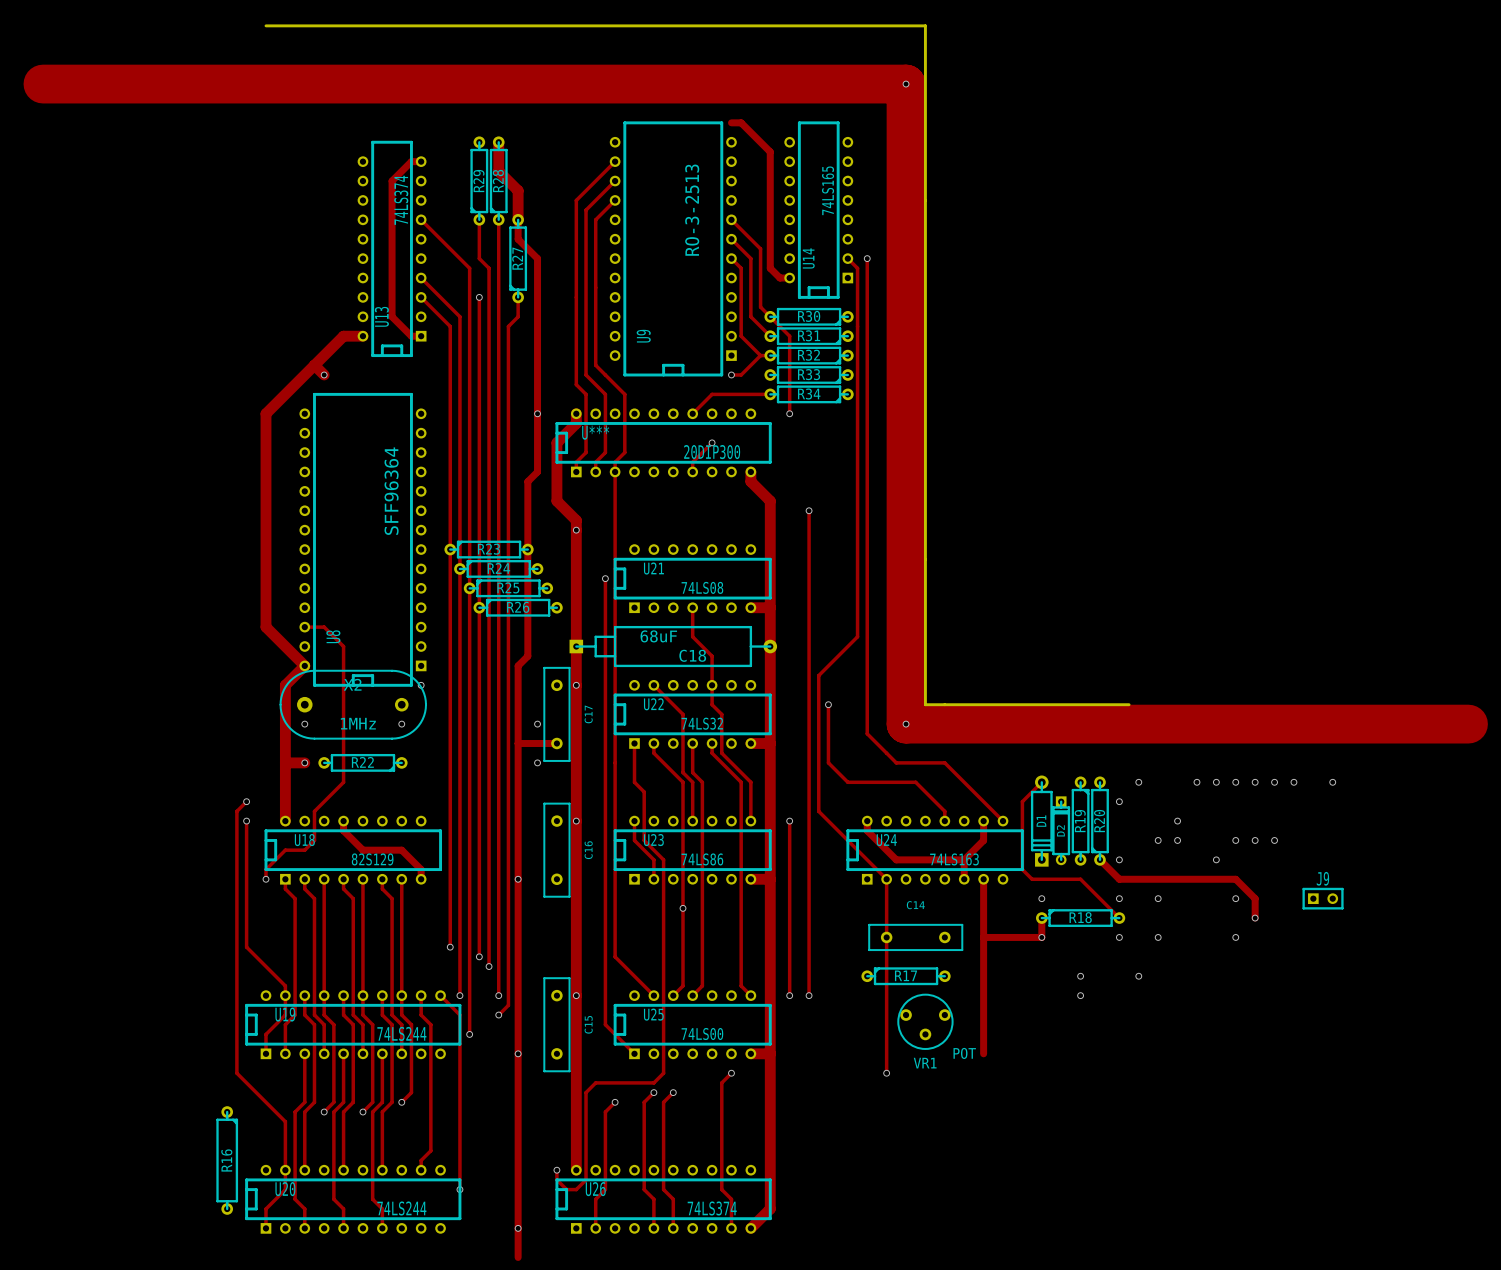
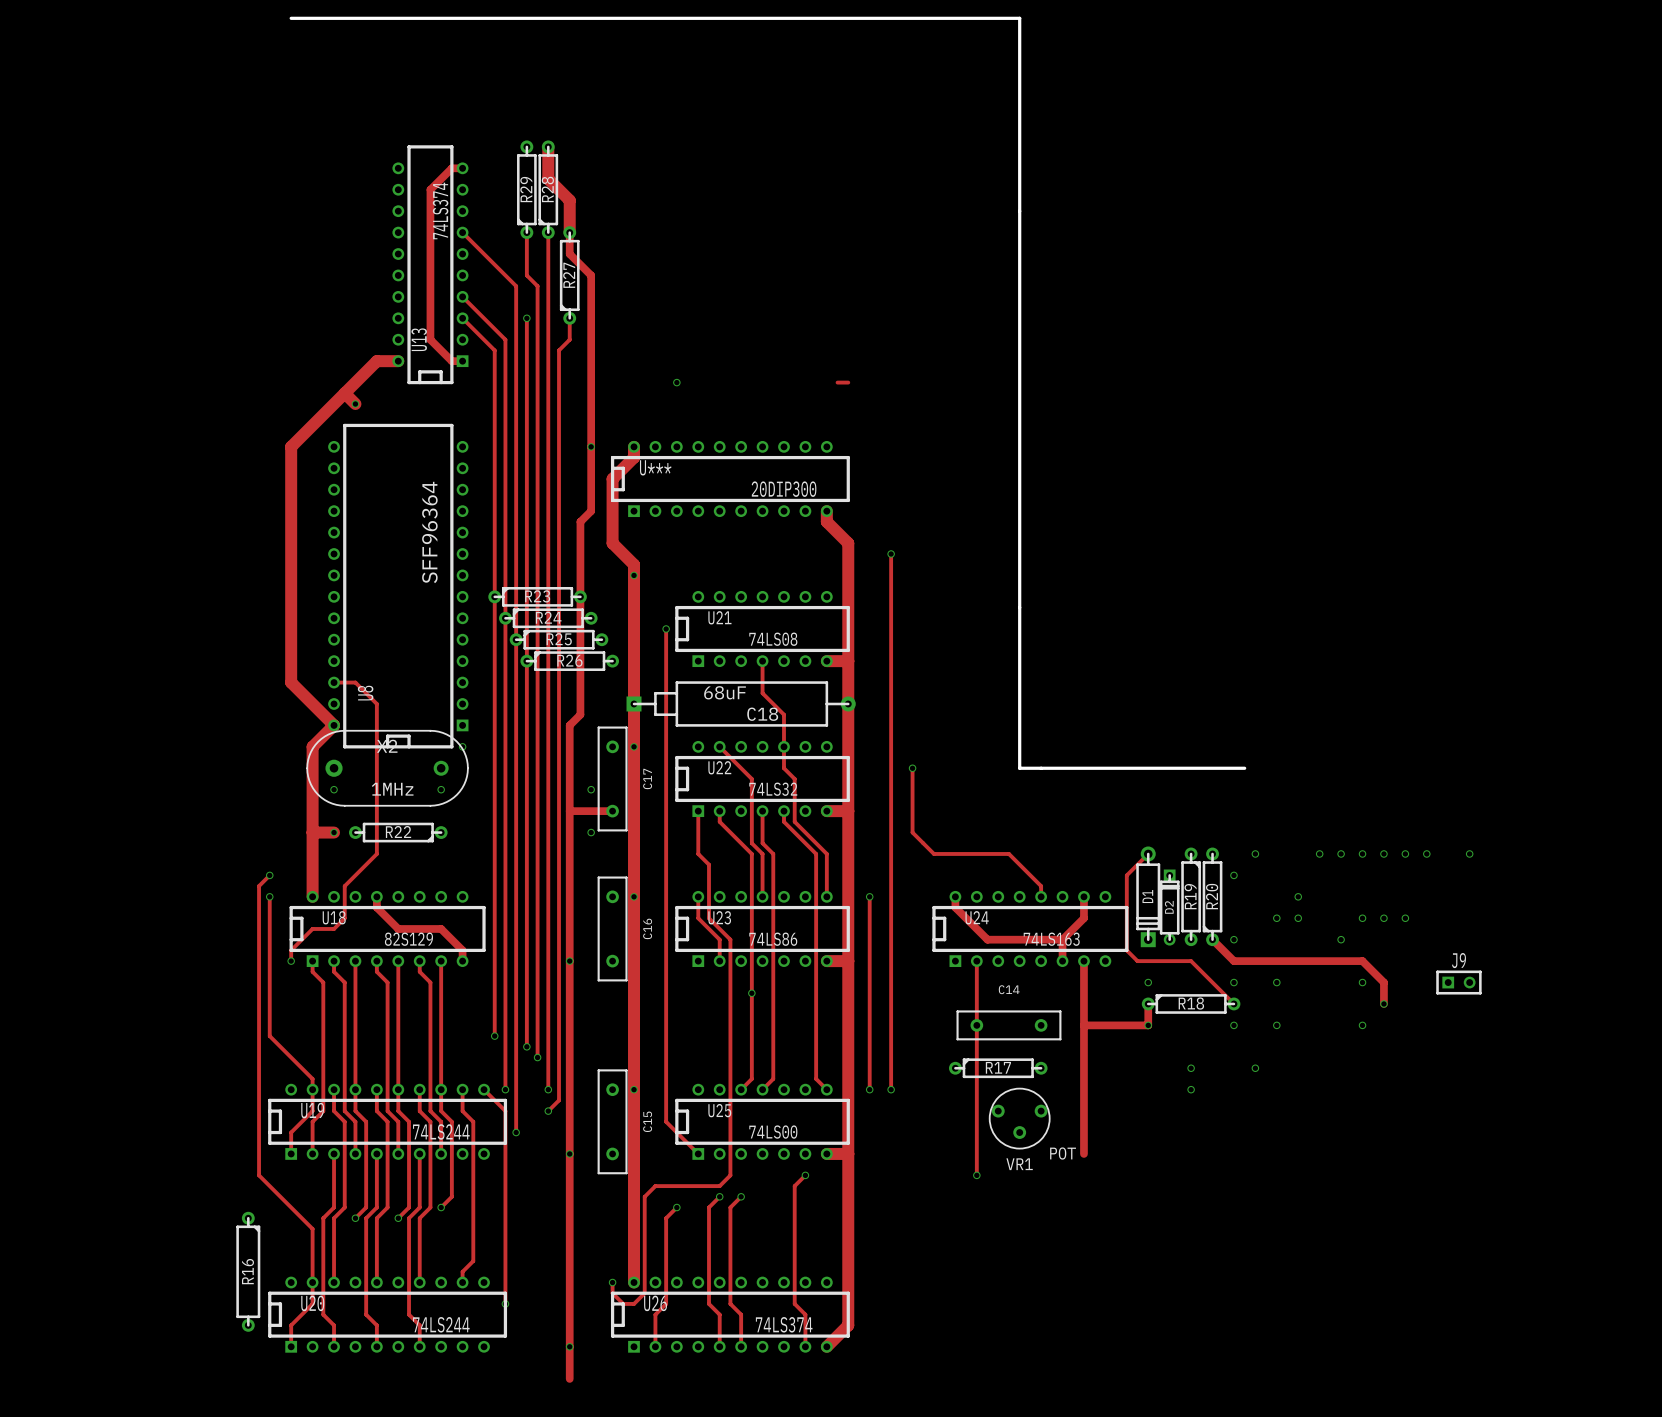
track: (42, 84) (906, 84) (906, 724) (1468, 724) -> none
via: (906, 84) -> none
track: (731, 122) (741, 122) (770, 151) (770, 268) (779, 278) (789, 278) -> none
track: (615, 161) (576, 200) (576, 384) (586, 394) (586, 452) (576, 462) (576, 471) -> none
track: (615, 181) (586, 210) (586, 374) (605, 394) (605, 452) (595, 462) (595, 471) -> none
track: (615, 200) (595, 219) (595, 365) (624, 394) (624, 452) (615, 462) (615, 956) (653, 995) -> none
U14: 74LS165 (818, 210) -> none
track: (731, 219) (760, 248) (760, 307) (789, 336) (789, 413) -> none
track: (731, 239) (750, 258) (750, 316) (770, 336) -> none
U9: RO-3-2513 (673, 248) -> none
track: (731, 258) (741, 268) (741, 336) (760, 355) (741, 374) (731, 374) -> none
track: (847, 258) (857, 268) (857, 636) (818, 675) (818, 811) (886, 879) -> none
track: (867, 258) (867, 733) (896, 762) (944, 762) (1003, 821) -> none
via: (867, 258) -> none
R30: (809, 316) -> none
R31: (809, 336) -> none
R32: (809, 355) -> none
via: (731, 374) -> none
R33: (809, 374) -> none
track: (770, 394) (712, 394) (692, 413) -> none
R34: (809, 394) -> none
via: (789, 413) -> none
track: (712, 442) (692, 462) (692, 471) -> none
via: (712, 442) -> none
via: (906, 724) -> none

